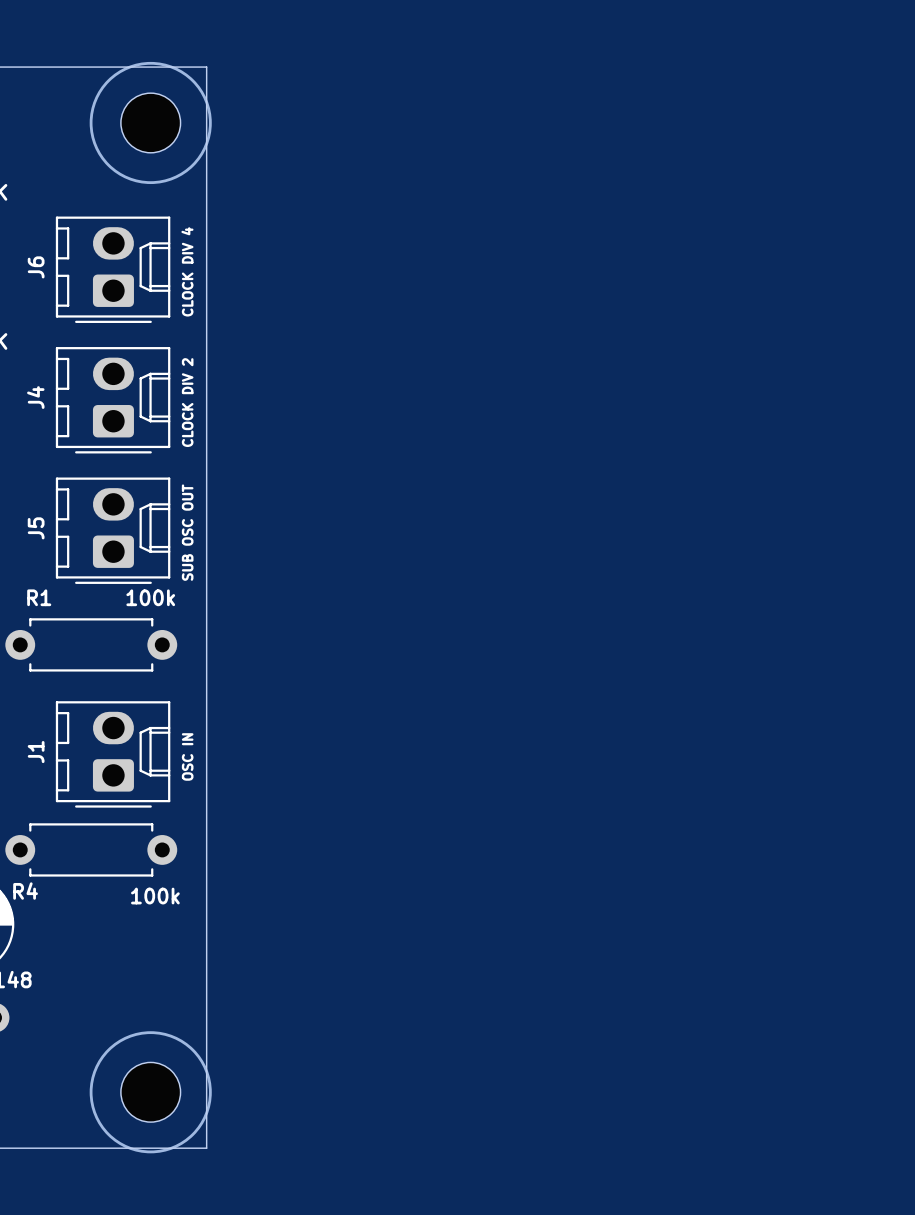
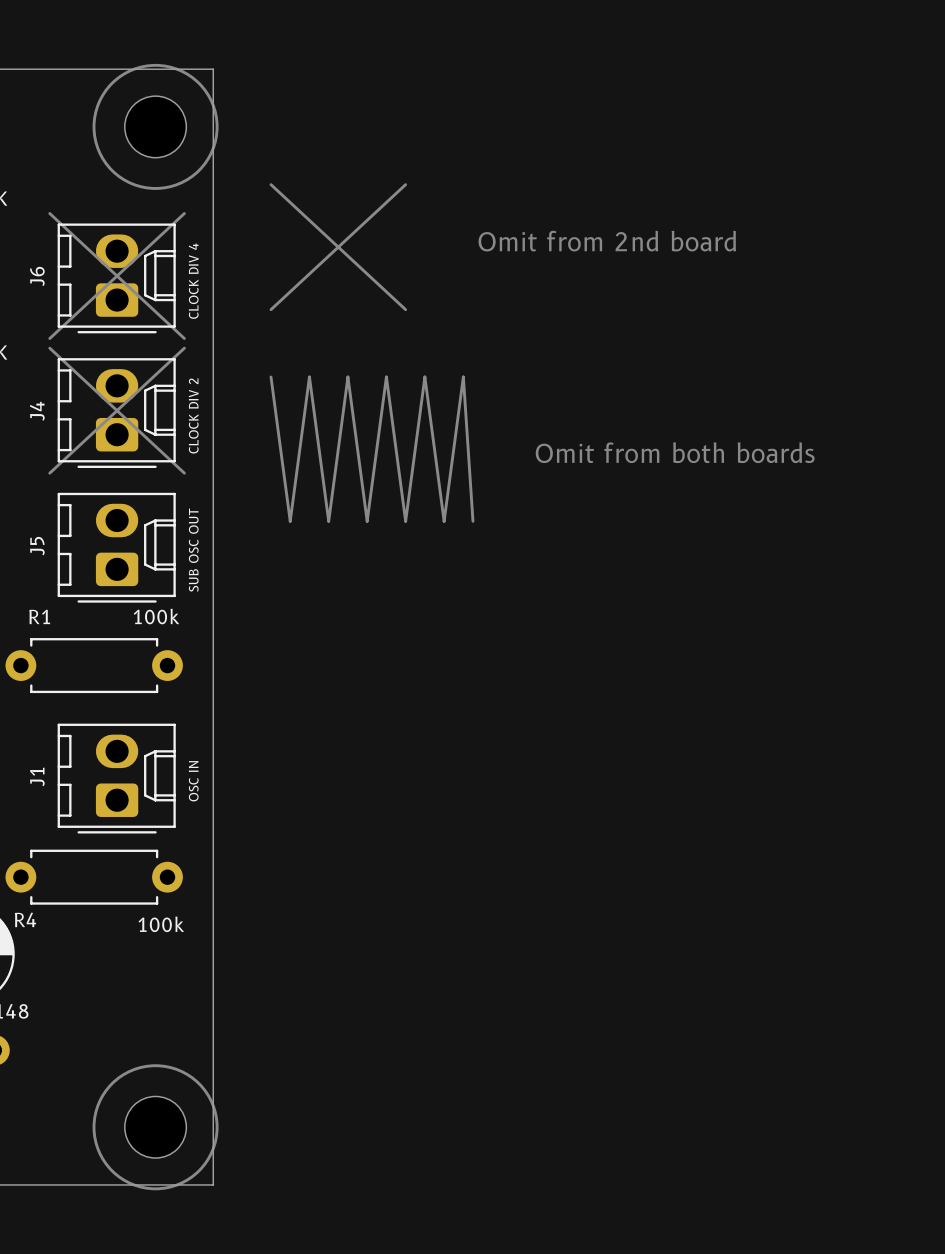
line: none -> (270, 184) (405, 309)
line: none -> (405, 184) (270, 309)
line: none -> (49, 213) (184, 338)
line: none -> (184, 213) (49, 338)
text: none -> Omit from 2nd board (607, 241)
line: none -> (49, 348) (184, 473)
line: none -> (184, 348) (49, 473)
line: none -> (270, 377) (290, 521) (309, 377) (328, 521) (347, 377) (367, 521) (386, 377) (405, 521) (424, 377) (444, 521) (463, 377) (472, 521)
text: none -> Omit from both boards (675, 452)

